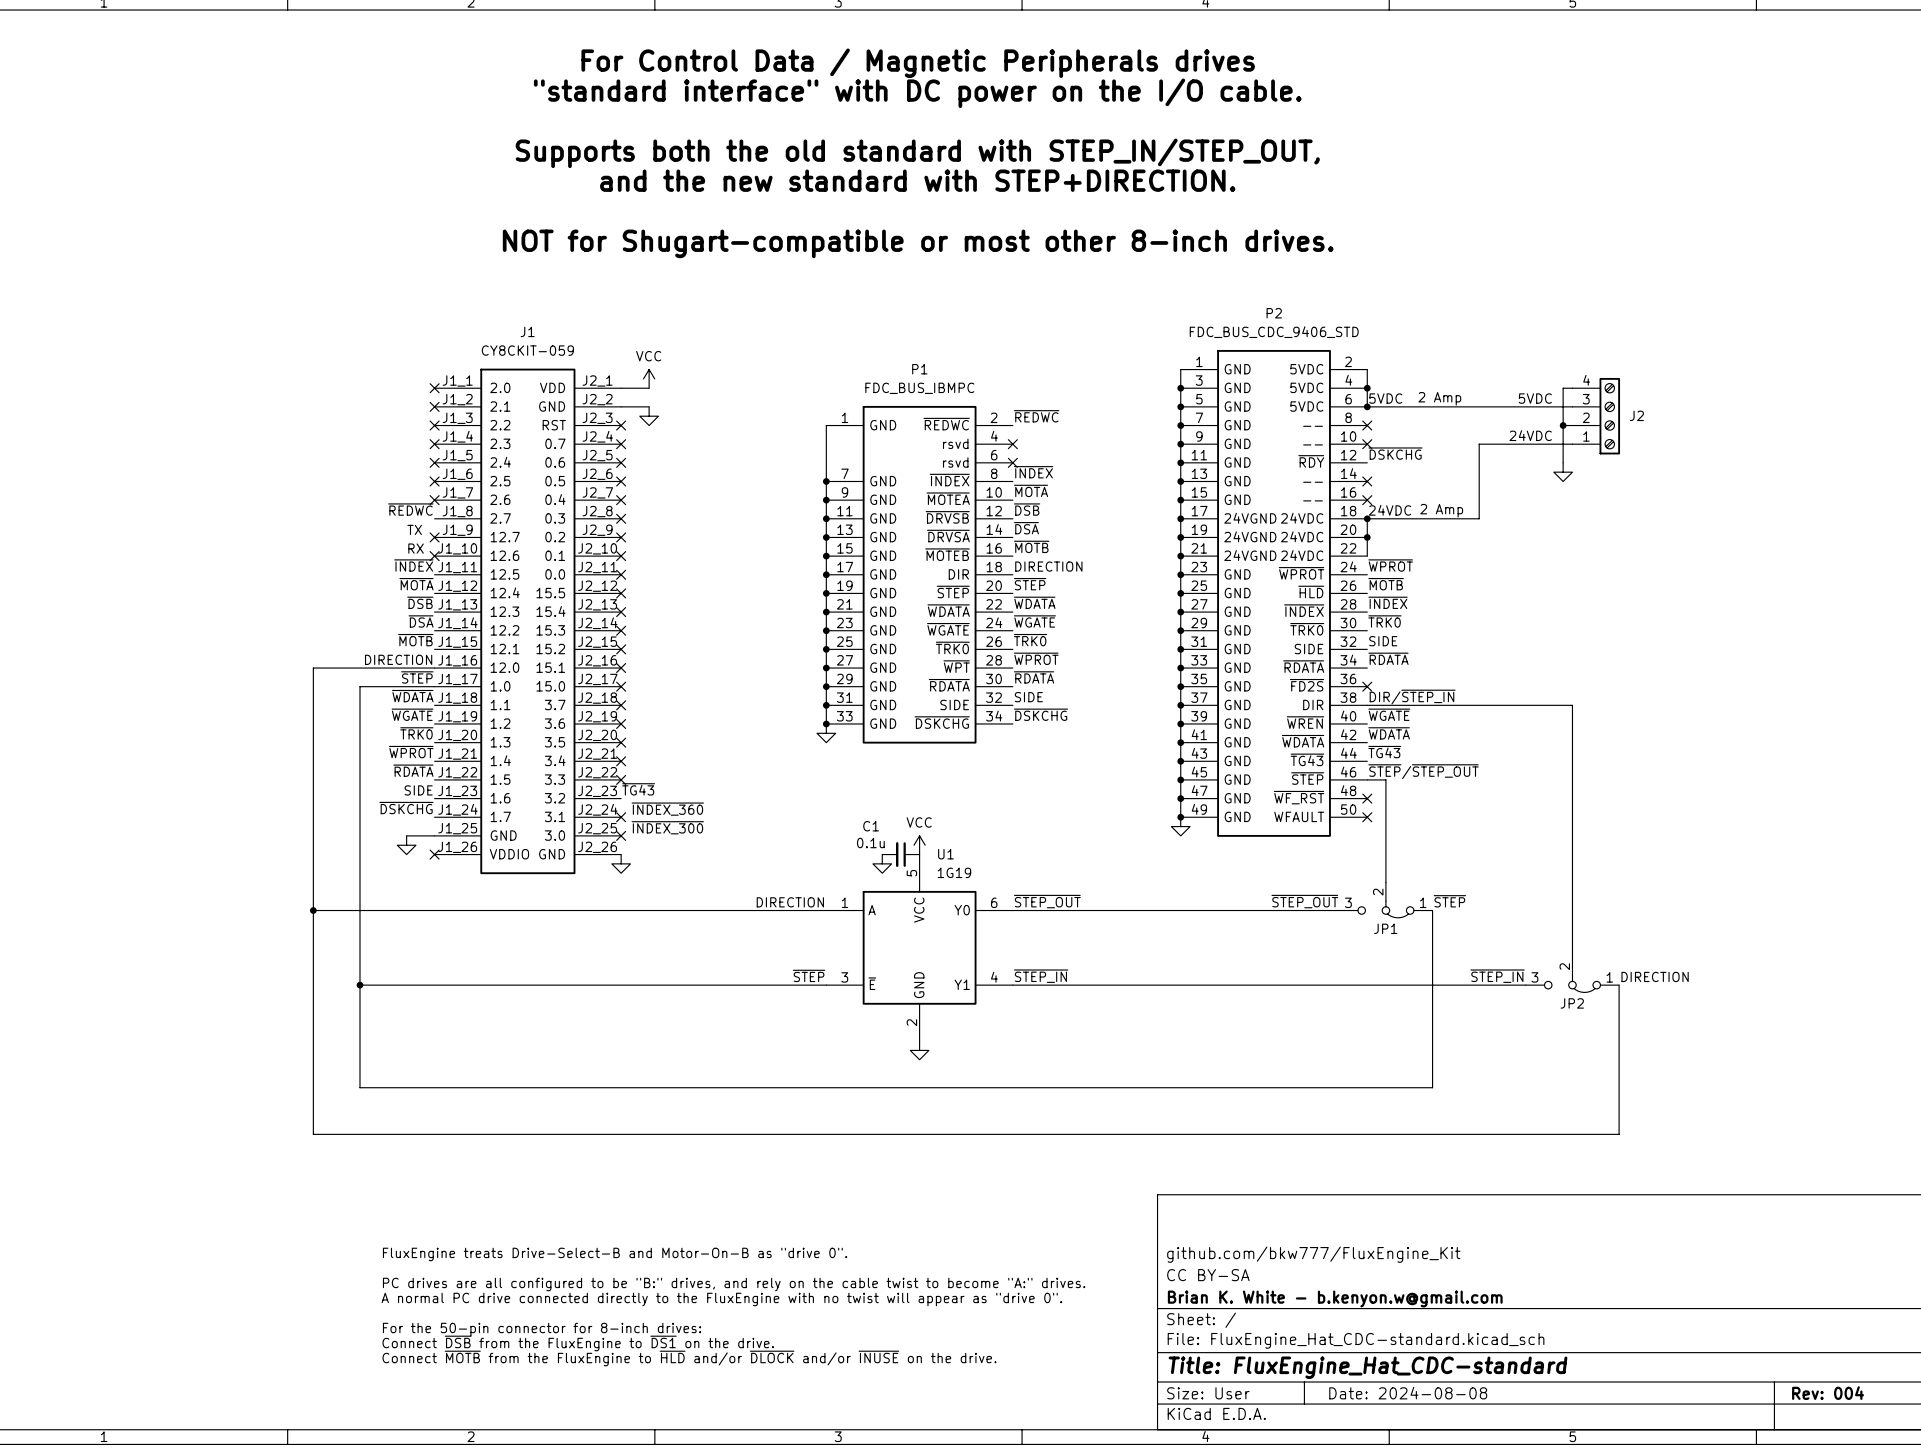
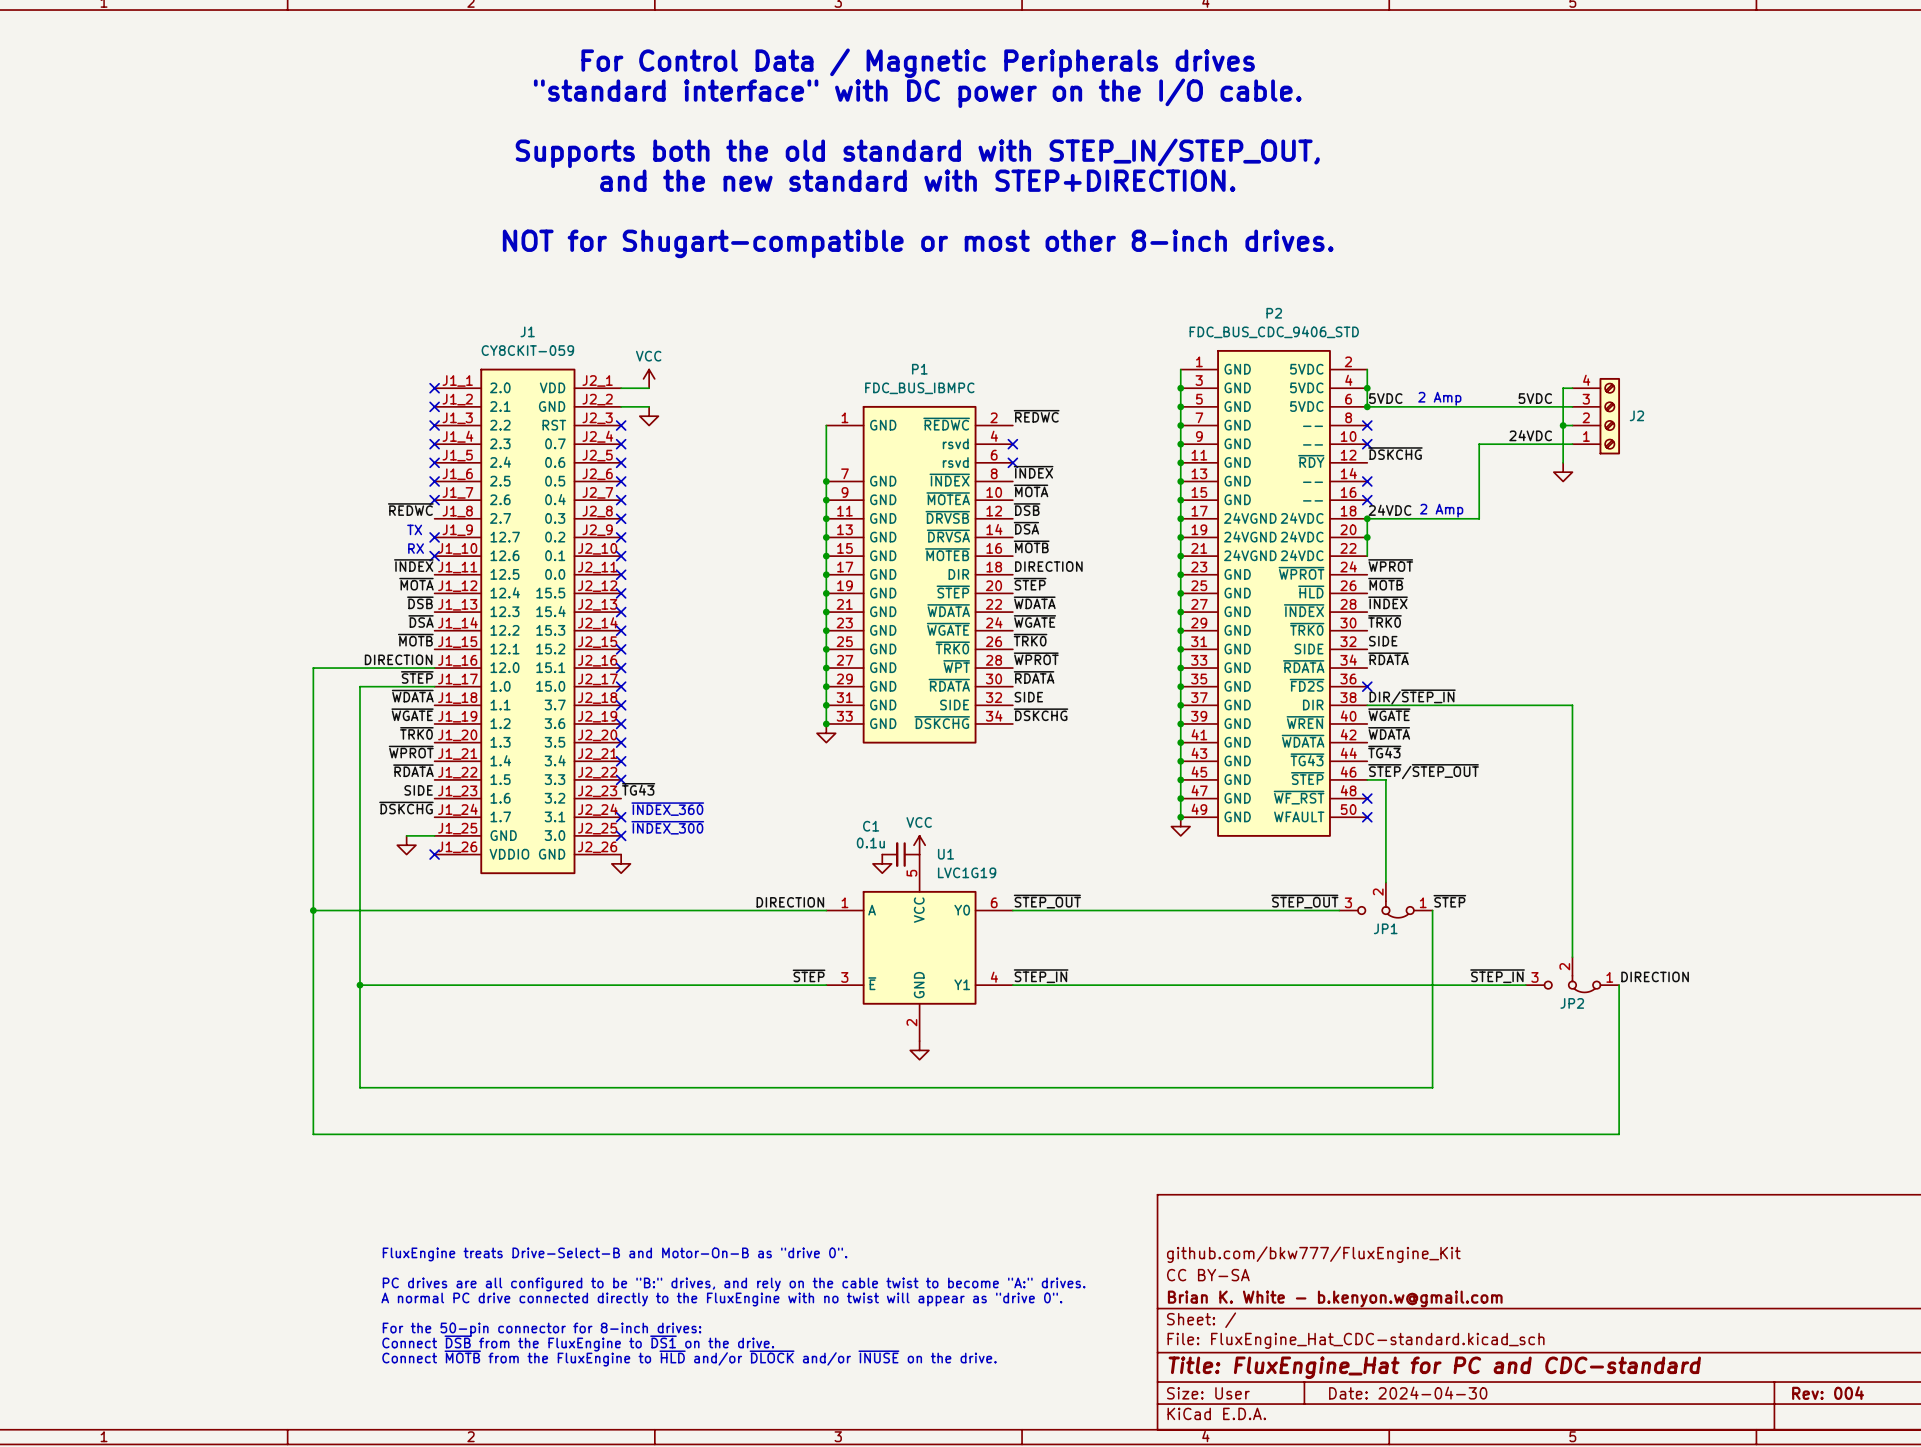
U1 value: 1G19 (954, 872) -> LVC1G19 (967, 872)
title block: Title: FluxEngine_Hat_CDC-standard (1367, 1367) -> Title: FluxEngine_Hat for PC and CDC-standard (1434, 1367)
title block: Date: 2024-08-08 (1408, 1393) -> Date: 2024-04-30 (1408, 1393)

